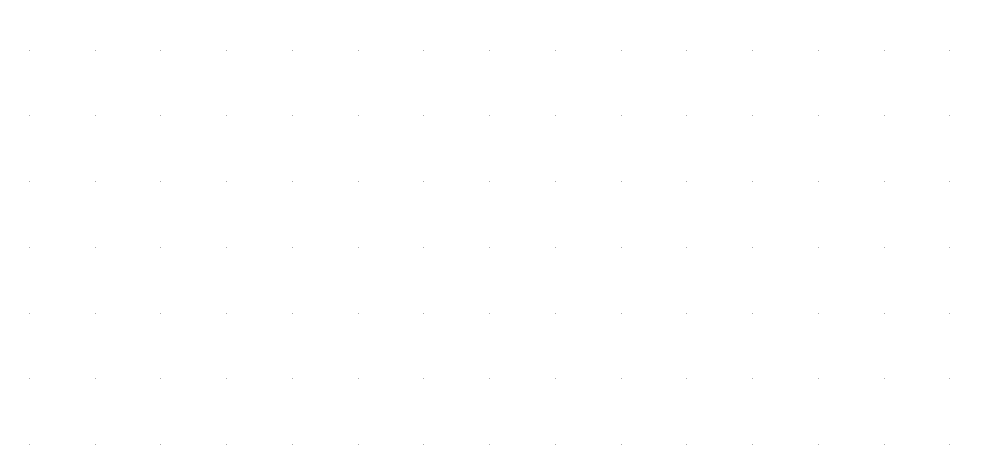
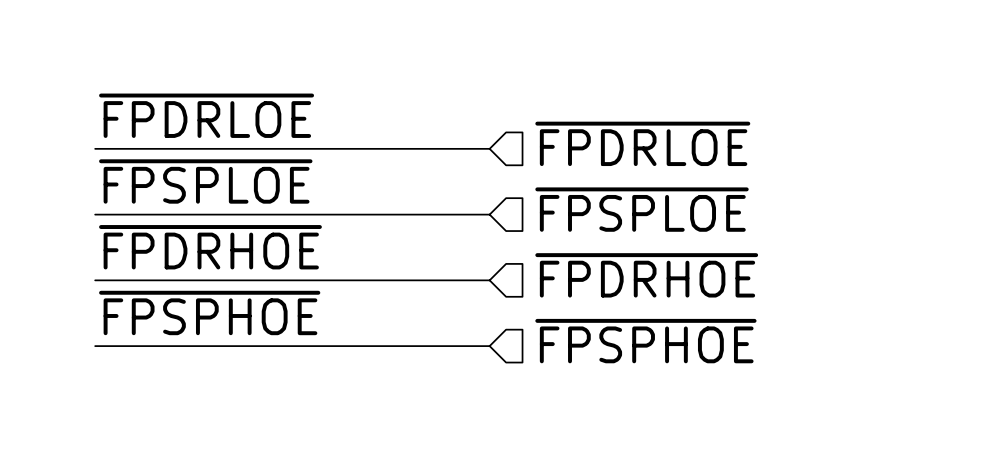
label: none -> ~{FPDRLOE} (206, 115)
hierarchical label: none -> ~{FPDRLOE} (642, 143)
wire: none -> (95, 148) (489, 148)
label: none -> ~{FPSPLOE} (205, 181)
hierarchical label: none -> ~{FPSPLOE} (642, 209)
wire: none -> (95, 214) (489, 214)
label: none -> ~{FPDRHOE} (210, 247)
hierarchical label: none -> ~{FPDRHOE} (646, 275)
wire: none -> (95, 280) (489, 280)
label: none -> ~{FPSPHOE} (209, 312)
hierarchical label: none -> ~{FPSPHOE} (645, 341)
wire: none -> (95, 346) (489, 346)

